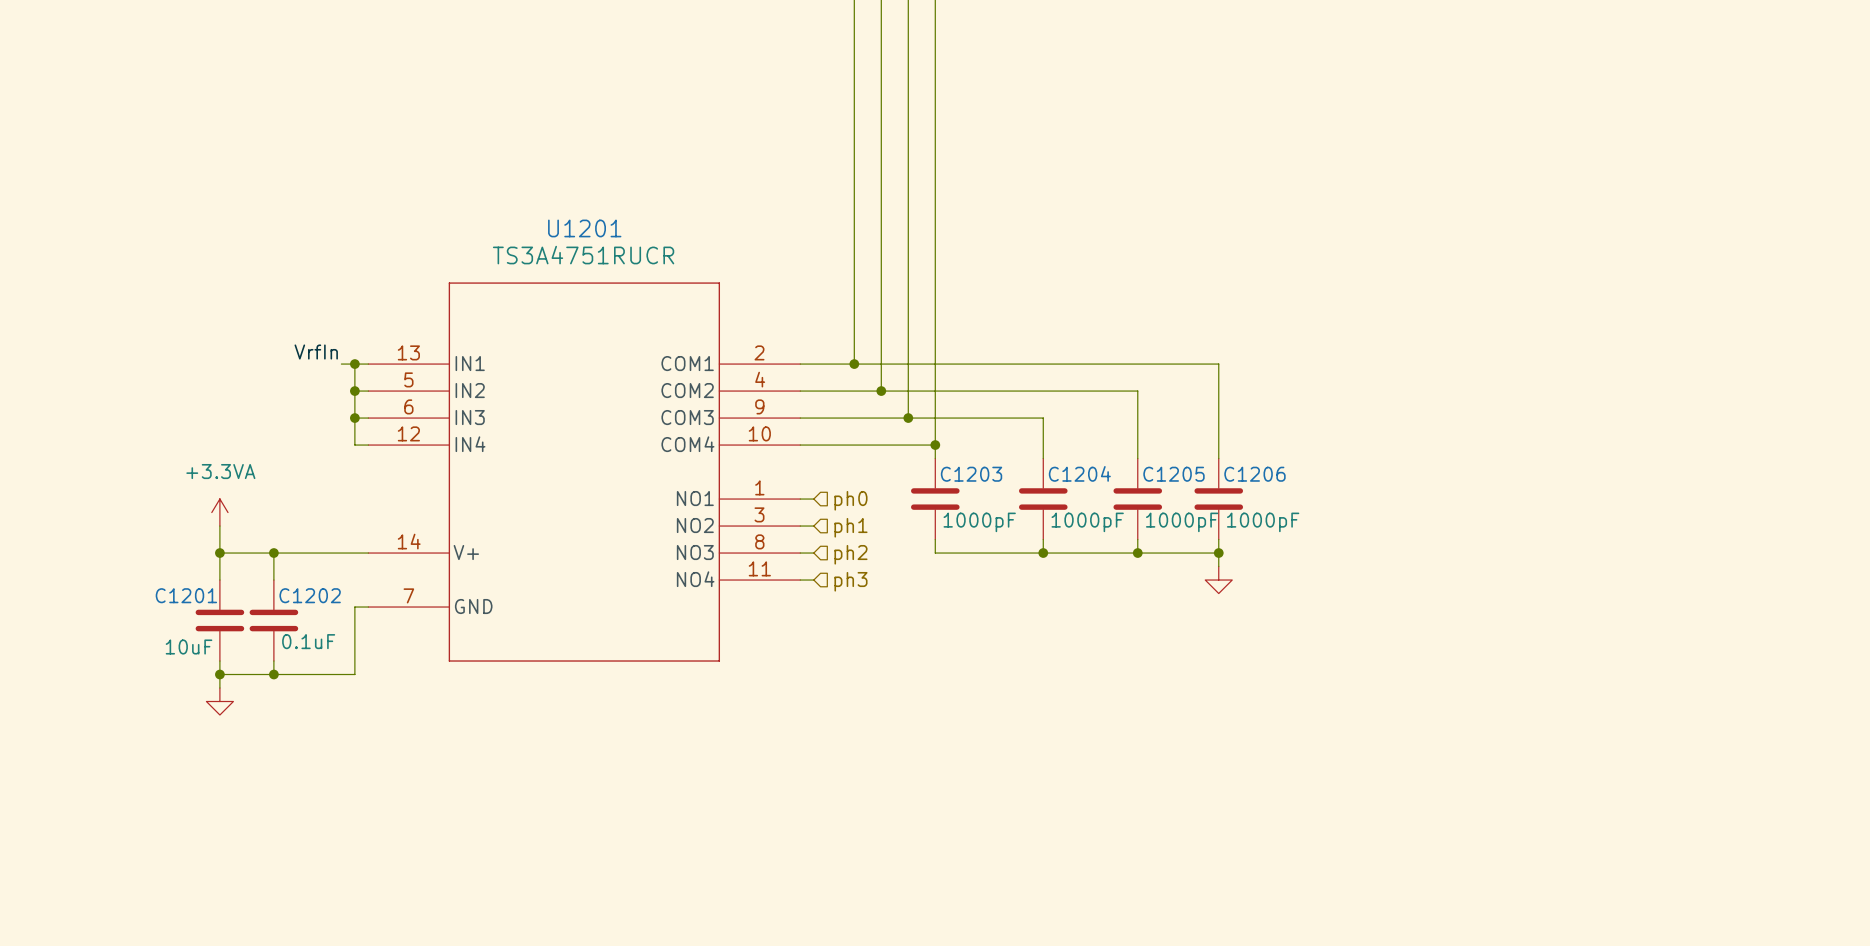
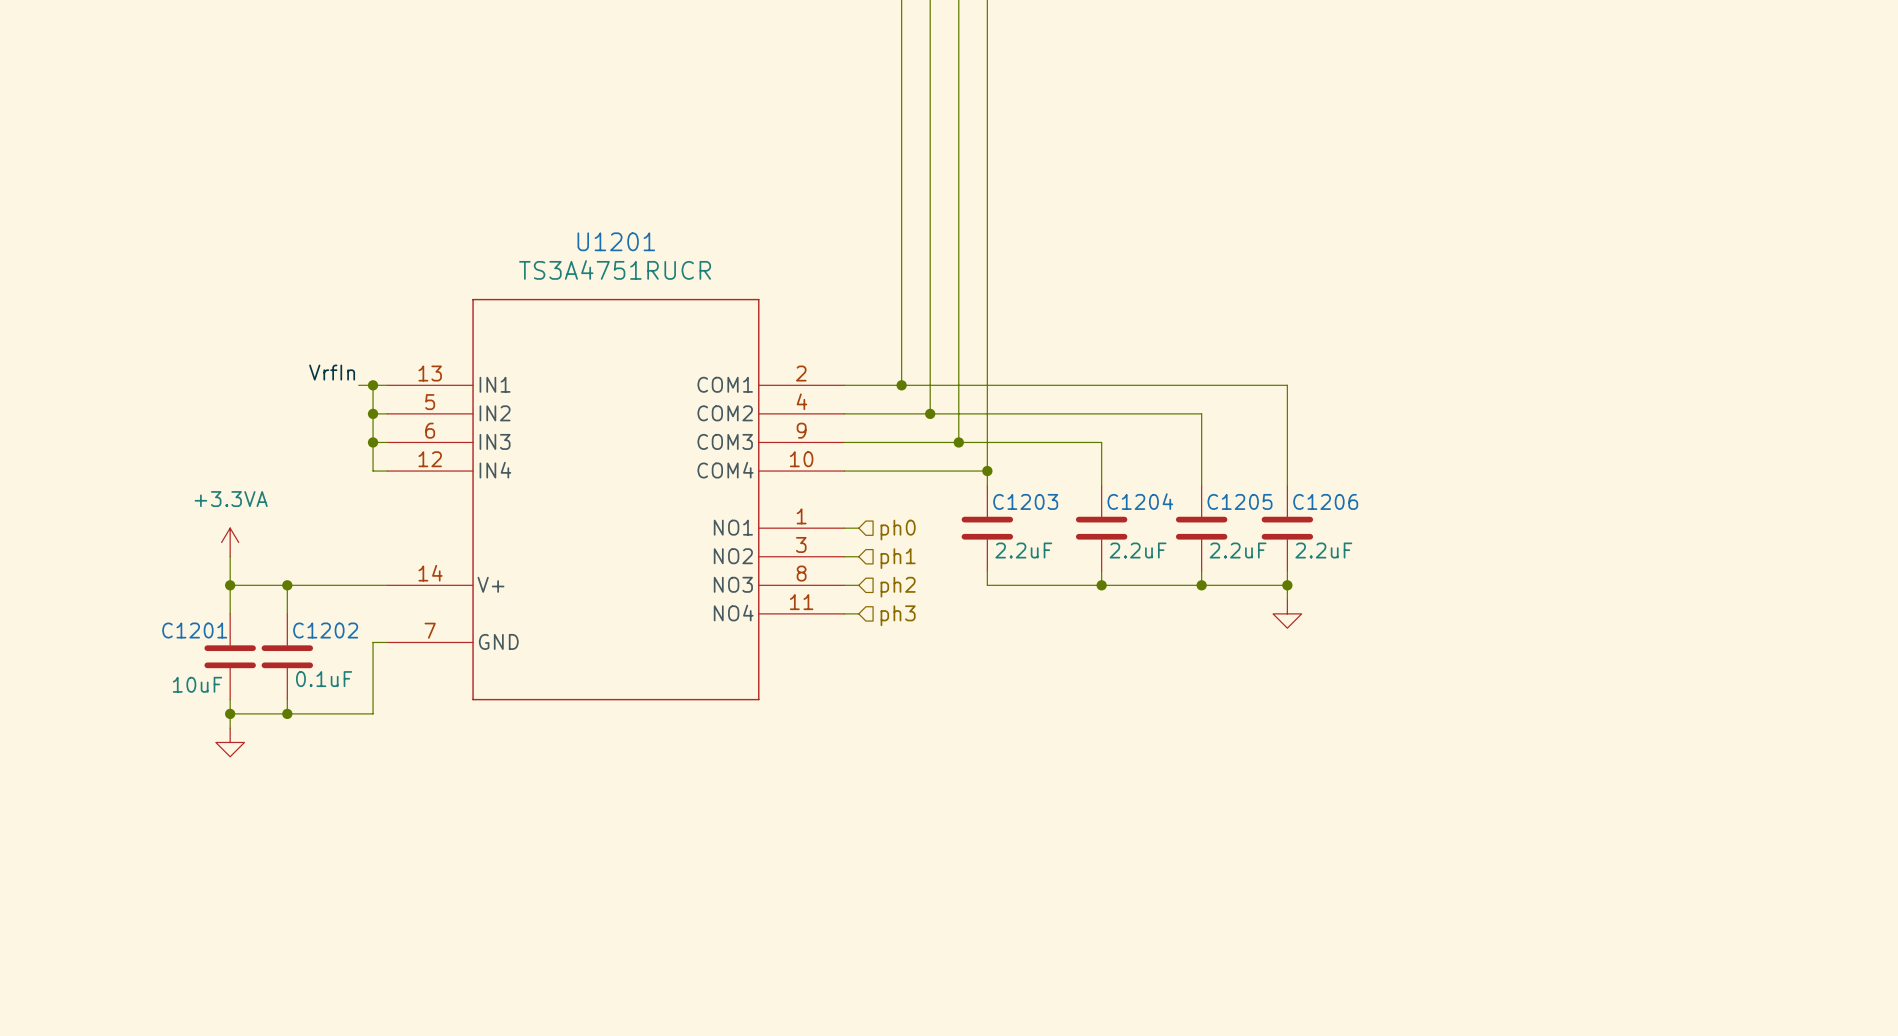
C1203 value: 1000pF (979, 522) -> 2.2uF (1023, 550)
C1204 value: 1000pF (1087, 522) -> 2.2uF (1138, 550)
C1205 value: 1000pF (1182, 522) -> 2.2uF (1238, 550)
C1206 value: 1000pF (1263, 522) -> 2.2uF (1323, 550)

